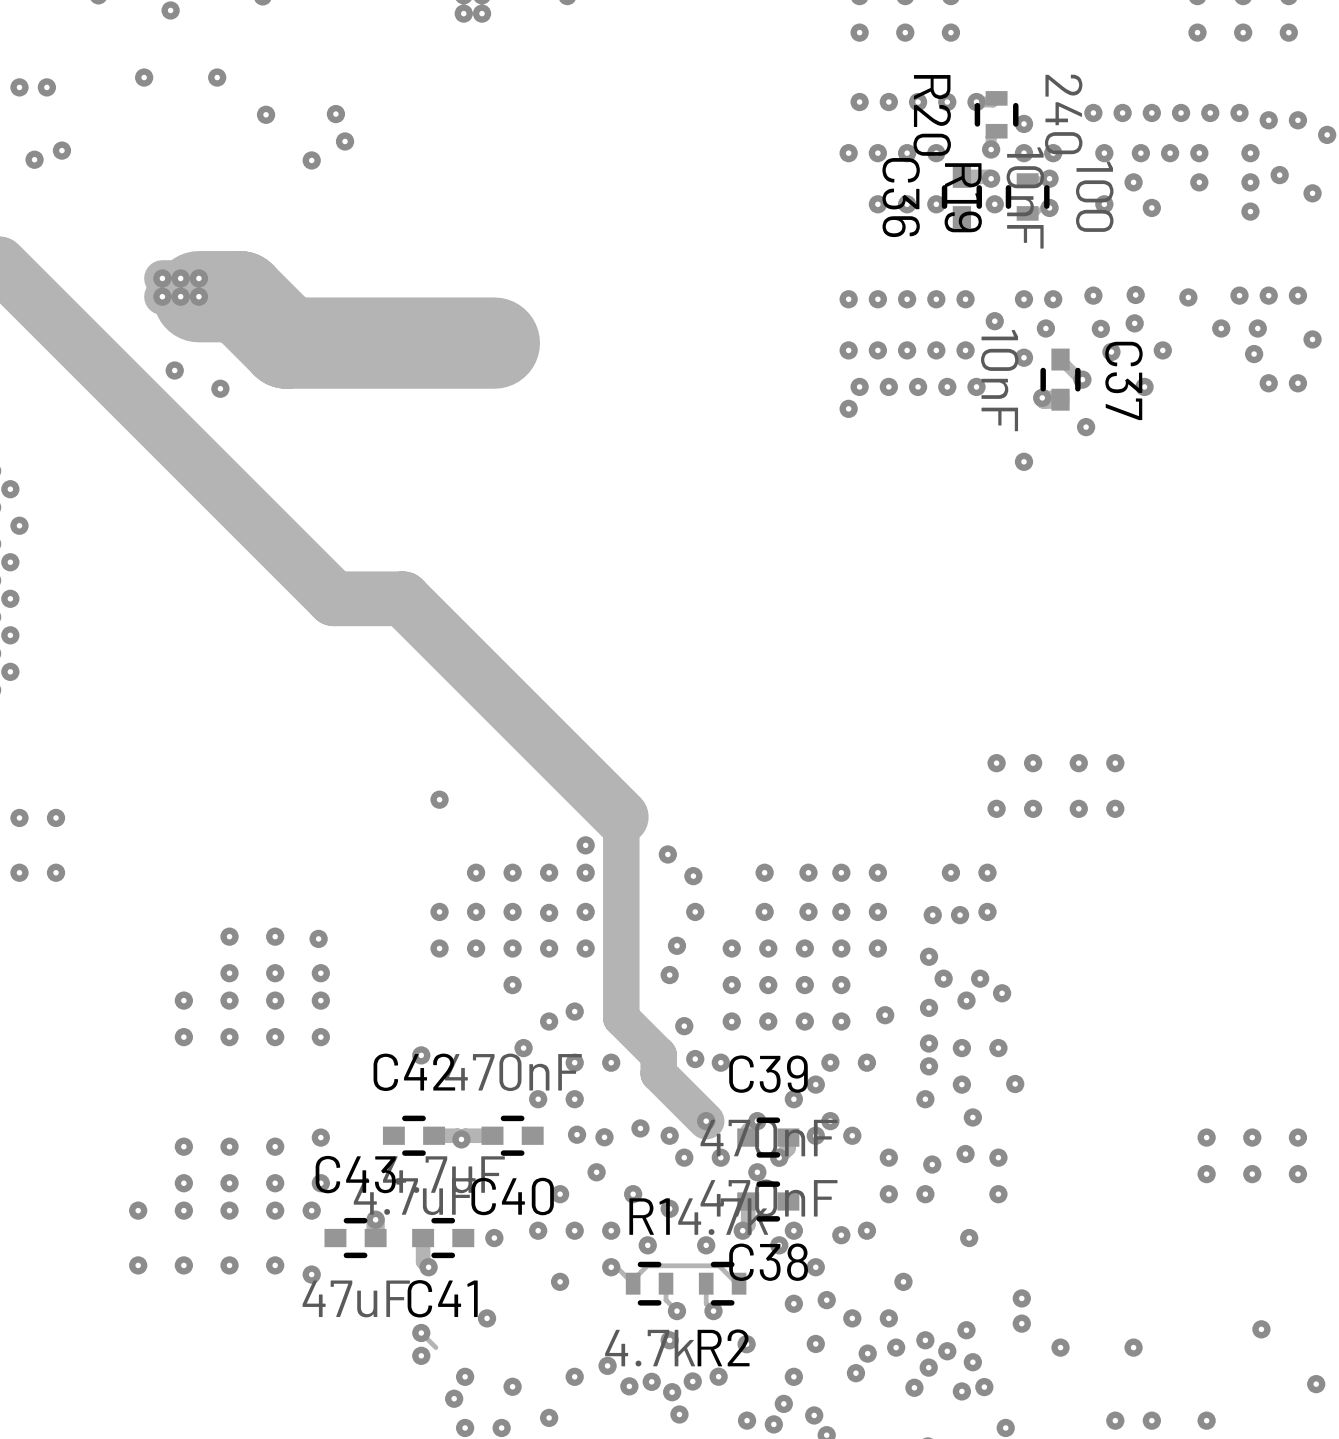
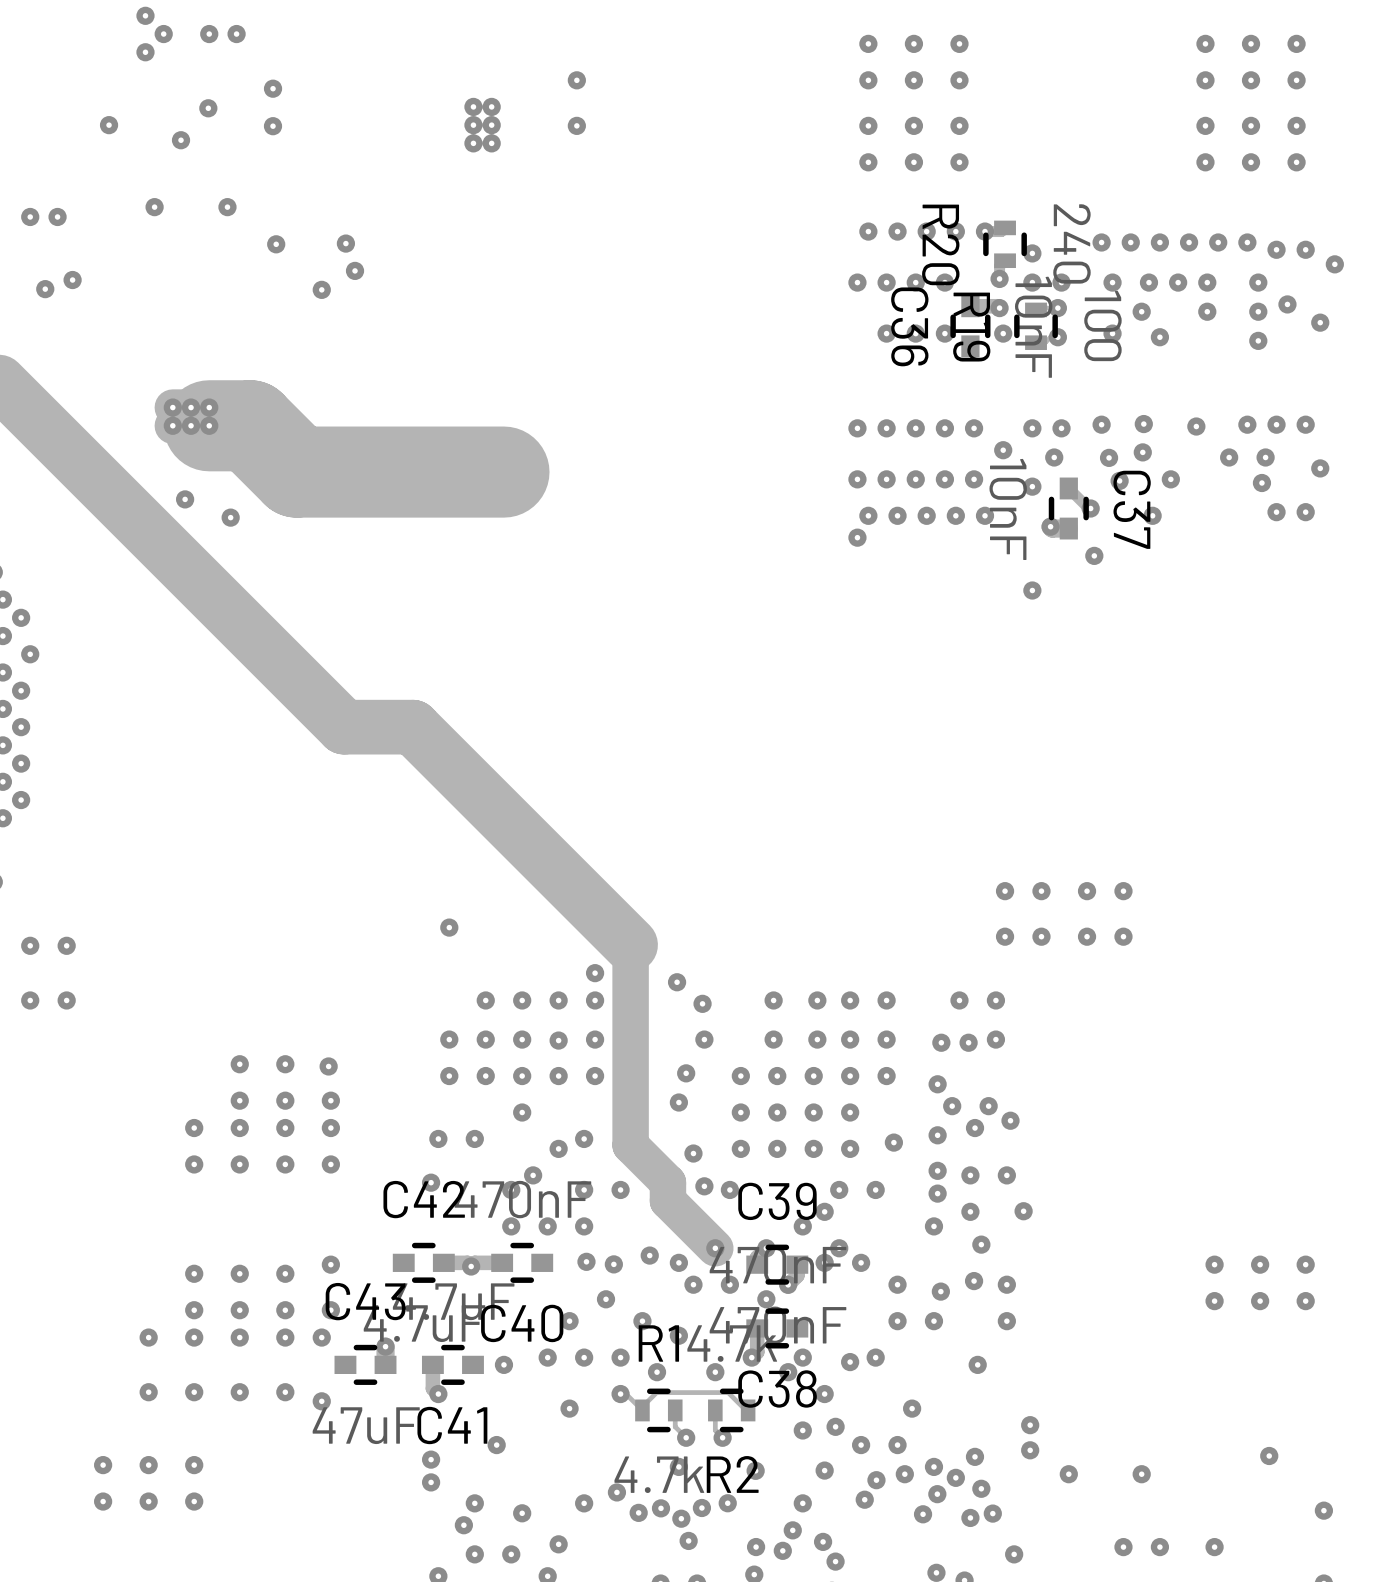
via: none -> (438, 1138)
via: none -> (474, 1138)
via: none -> (511, 1189)
via: none -> (511, 1226)
track: (421, 1333) (435, 1347) -> none
via: none -> (103, 1465)
via: none -> (148, 1465)
via: none -> (194, 1465)
via: none -> (103, 1501)
via: none -> (148, 1501)
via: none -> (194, 1501)

